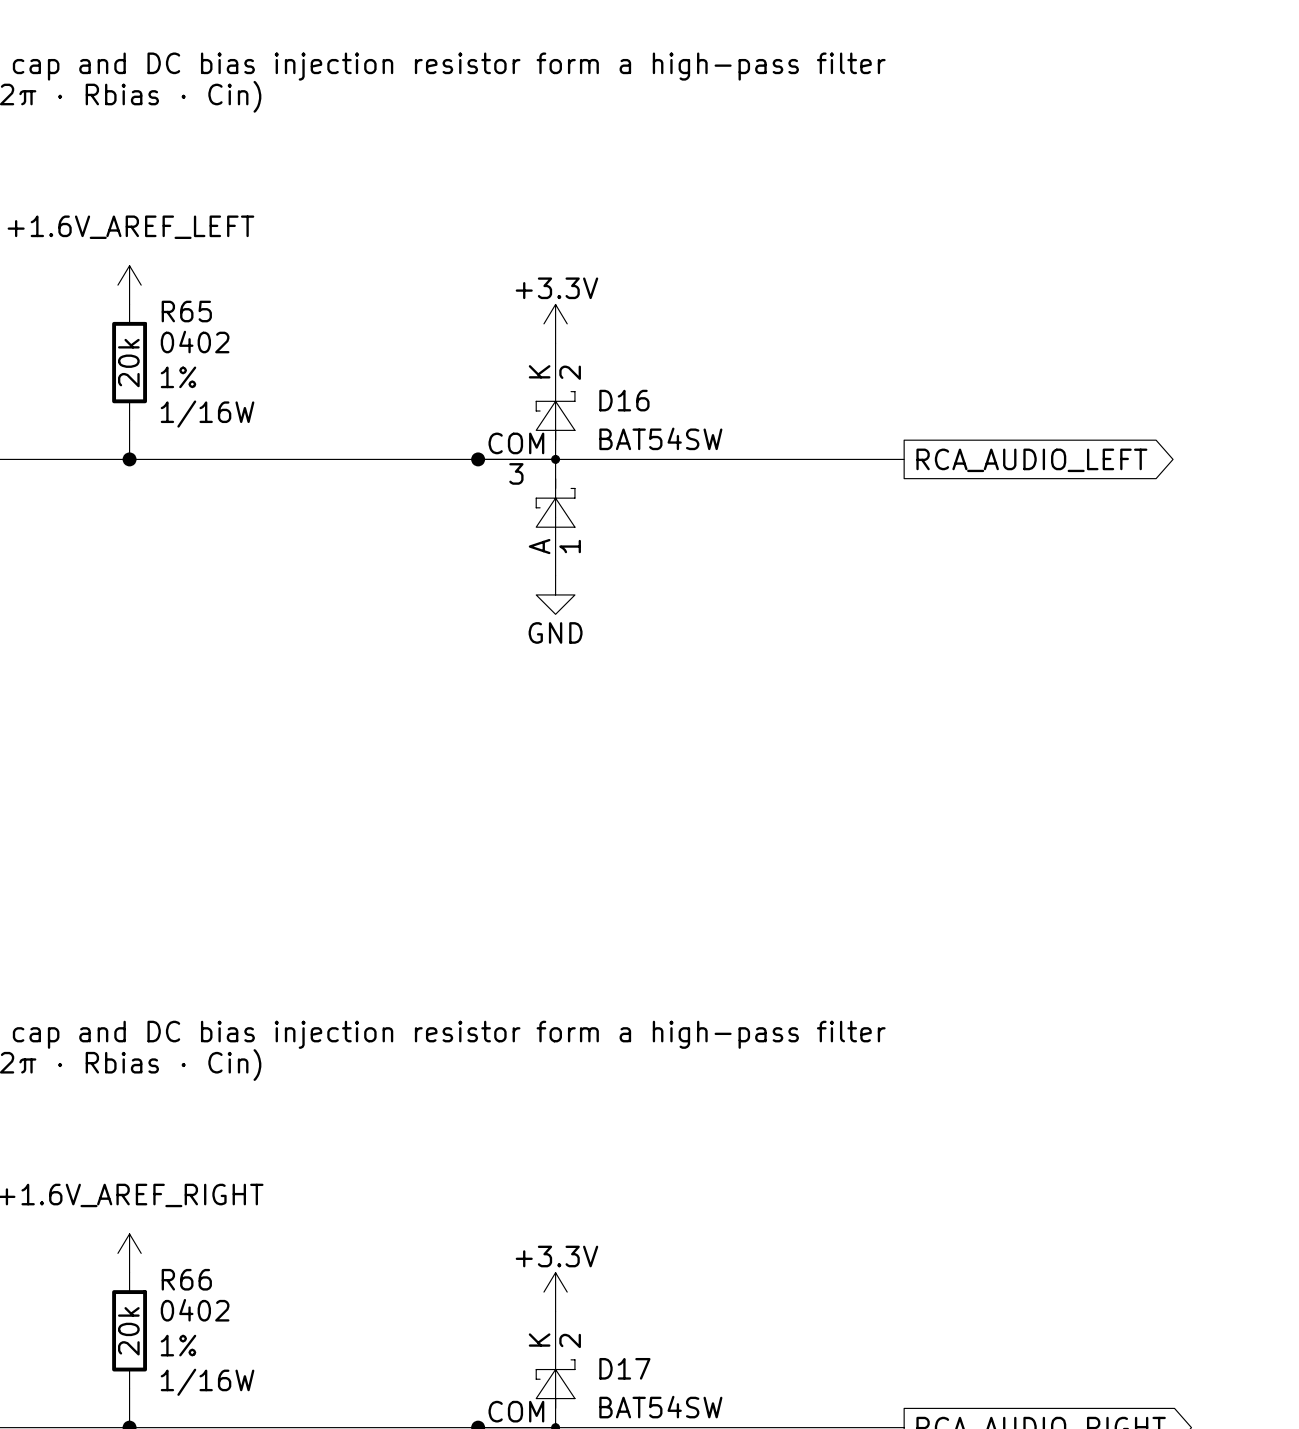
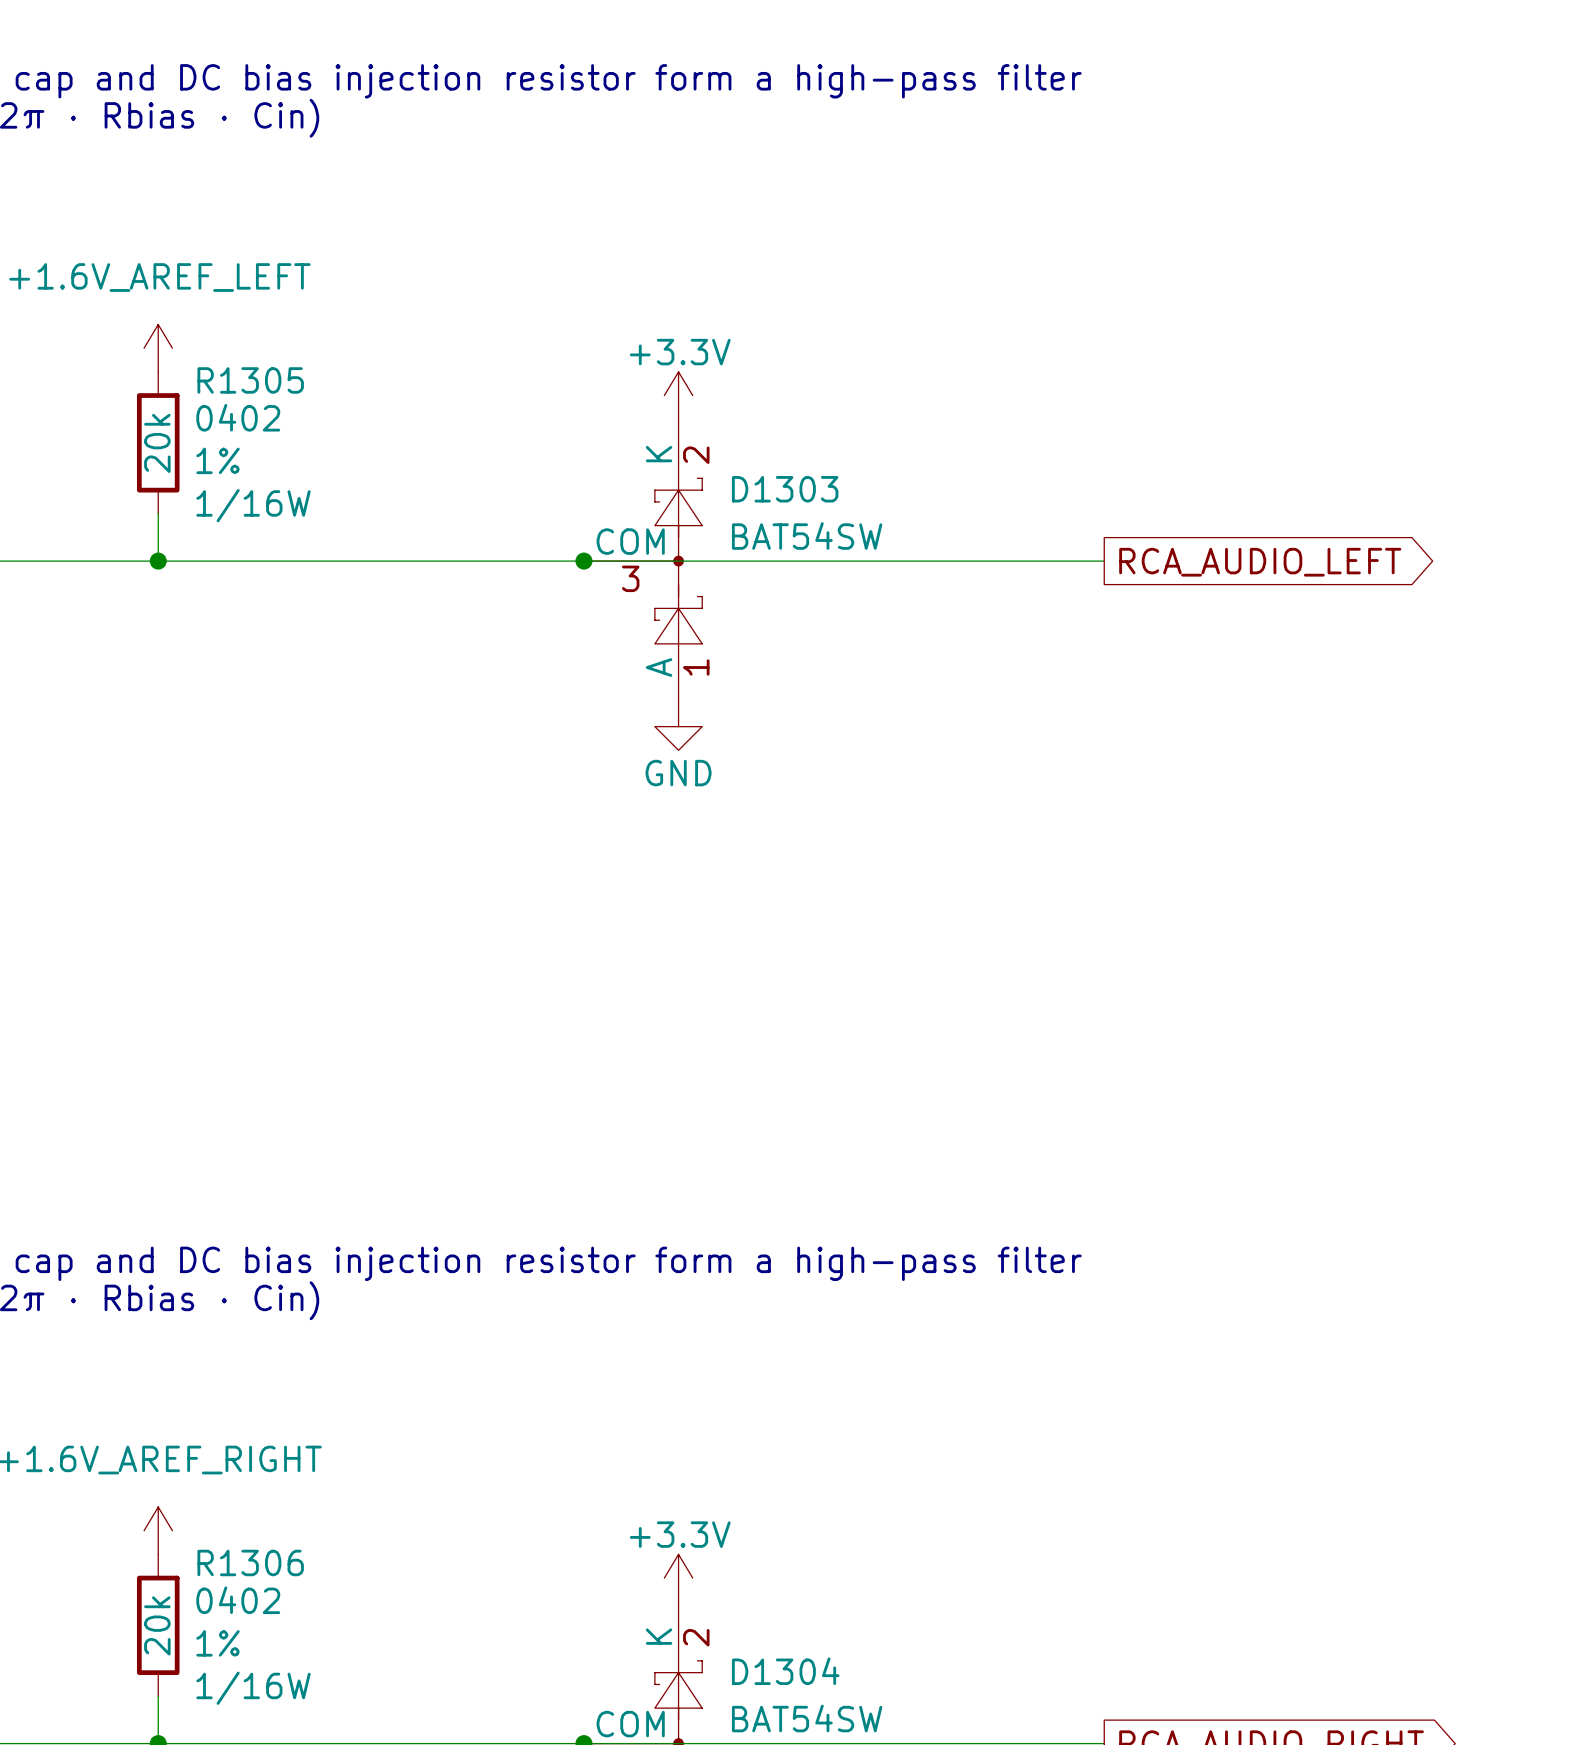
R65 name: R65 (186, 311) -> R1305 (250, 380)
D16 name: D16 (624, 400) -> D1303 (785, 489)
R66 name: R66 (186, 1279) -> R1306 (250, 1562)
D17 name: D17 (624, 1368) -> D1304 (785, 1671)

